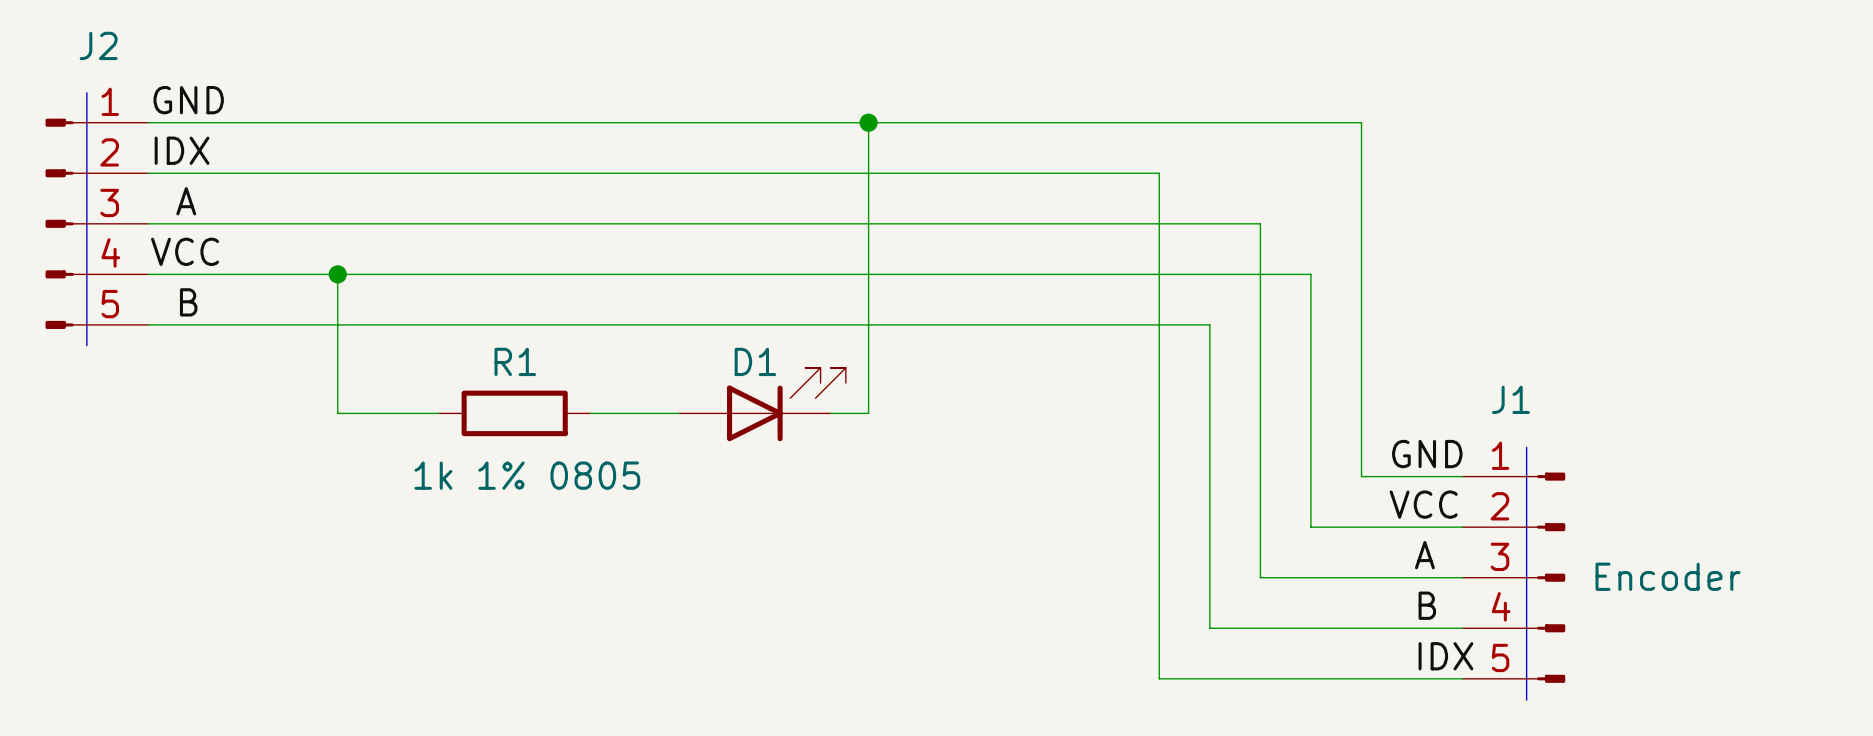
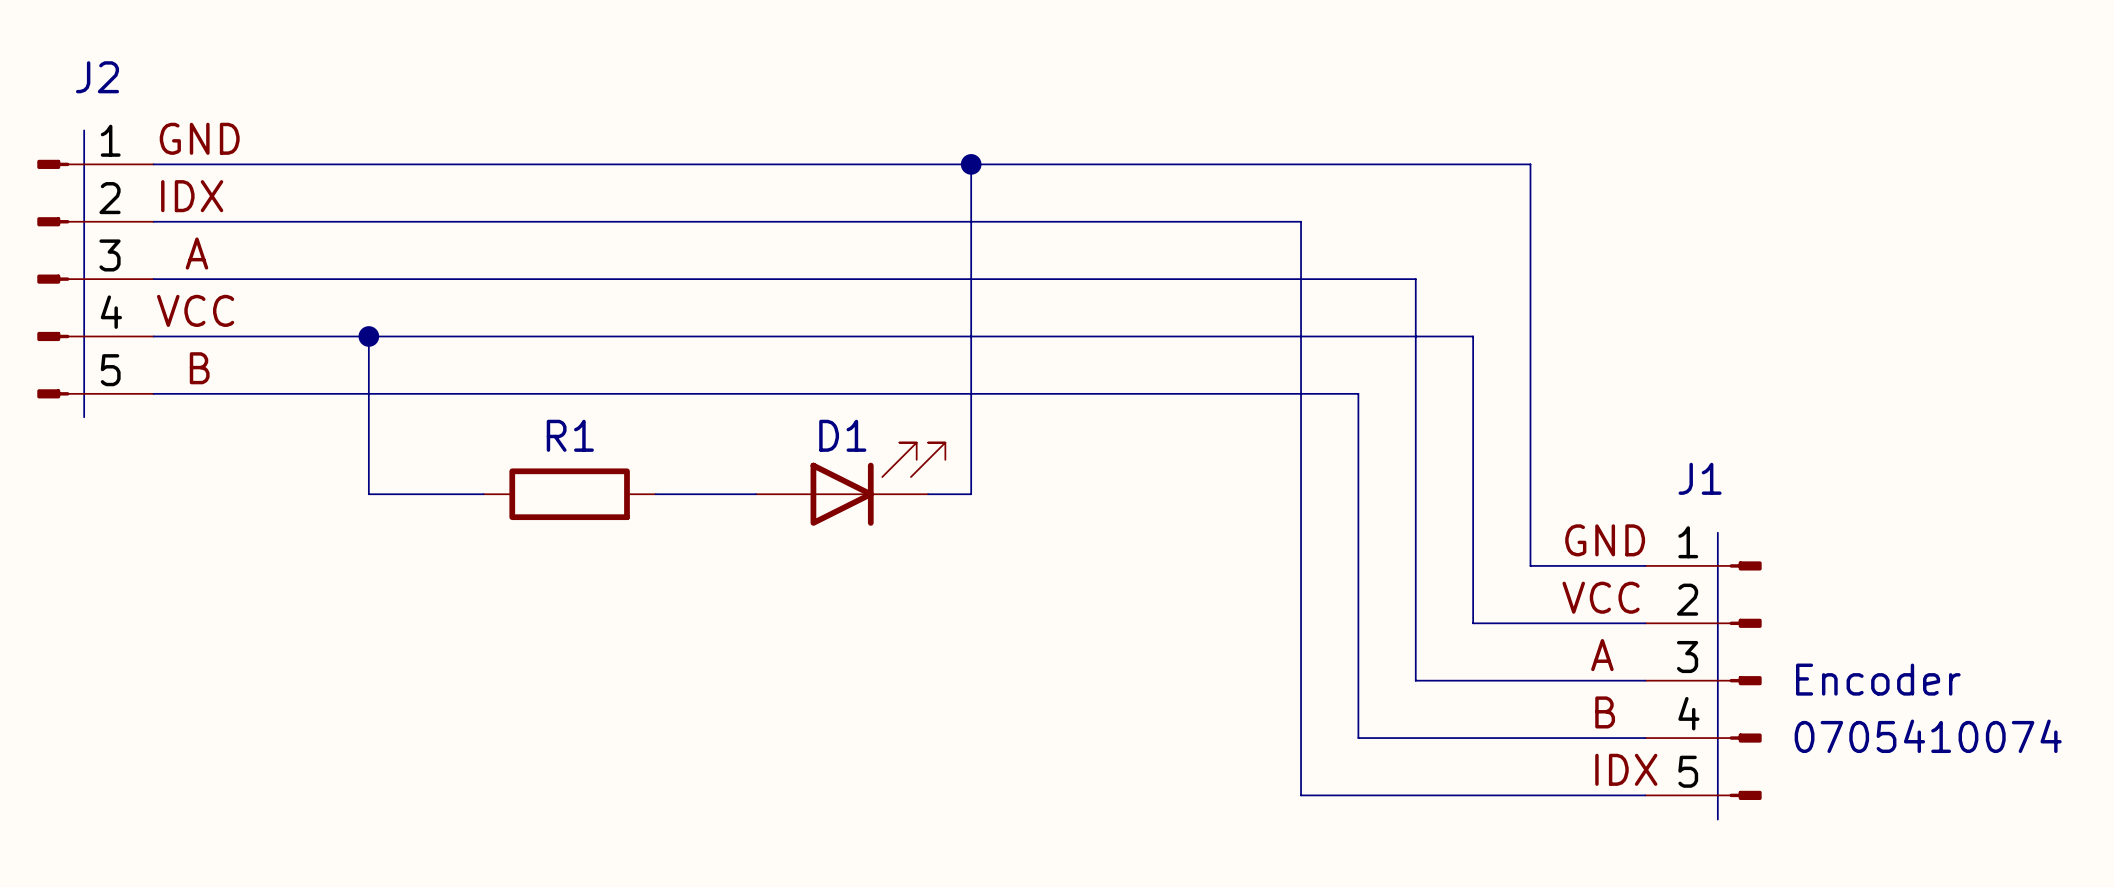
R1 value: 1k 1% 0805 (527, 475) -> none
J1 text: none -> 0705410074 (1928, 736)

